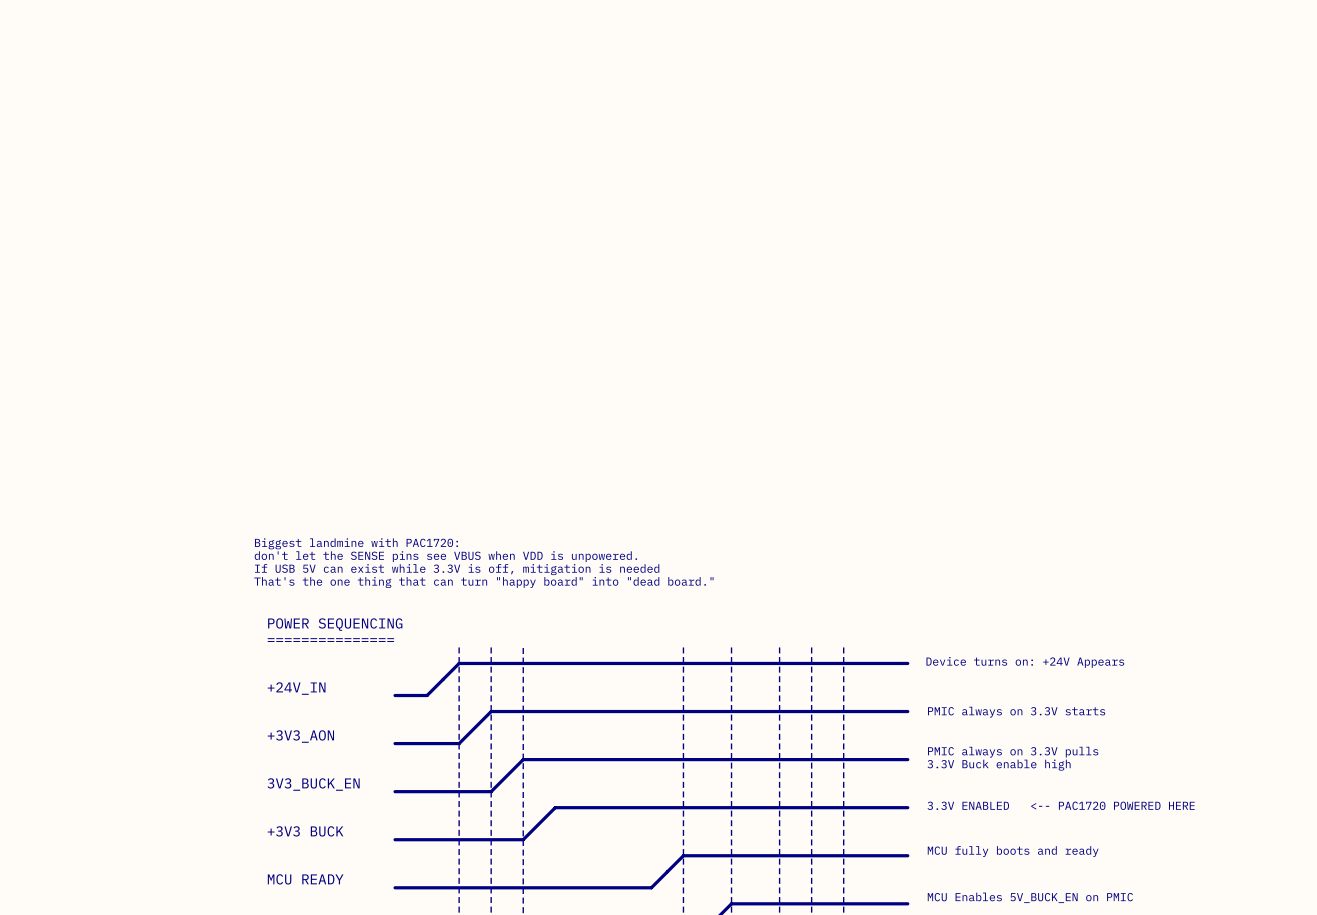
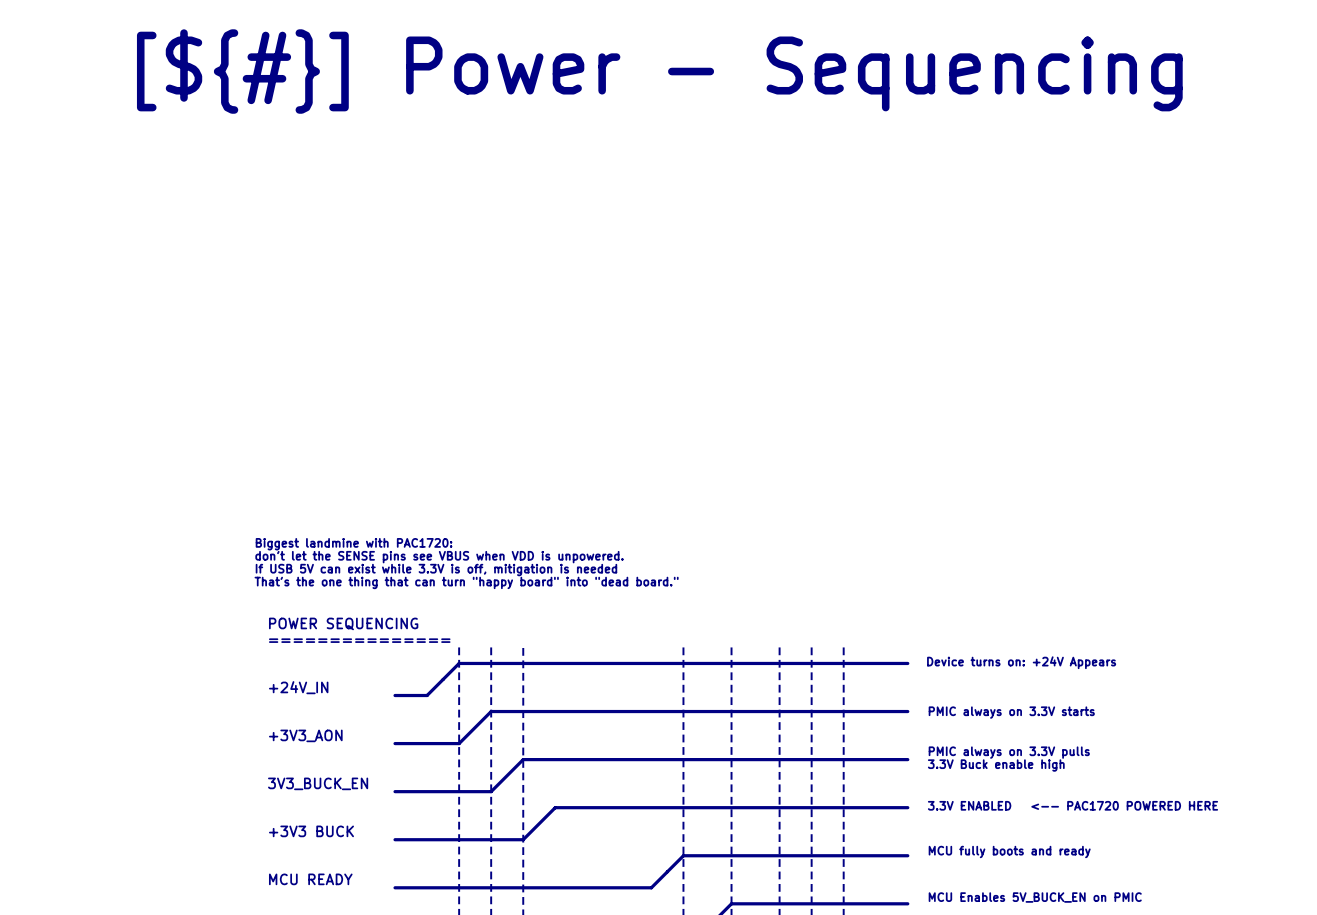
text: none -> [${#}] Power - Sequencing (659, 71)

